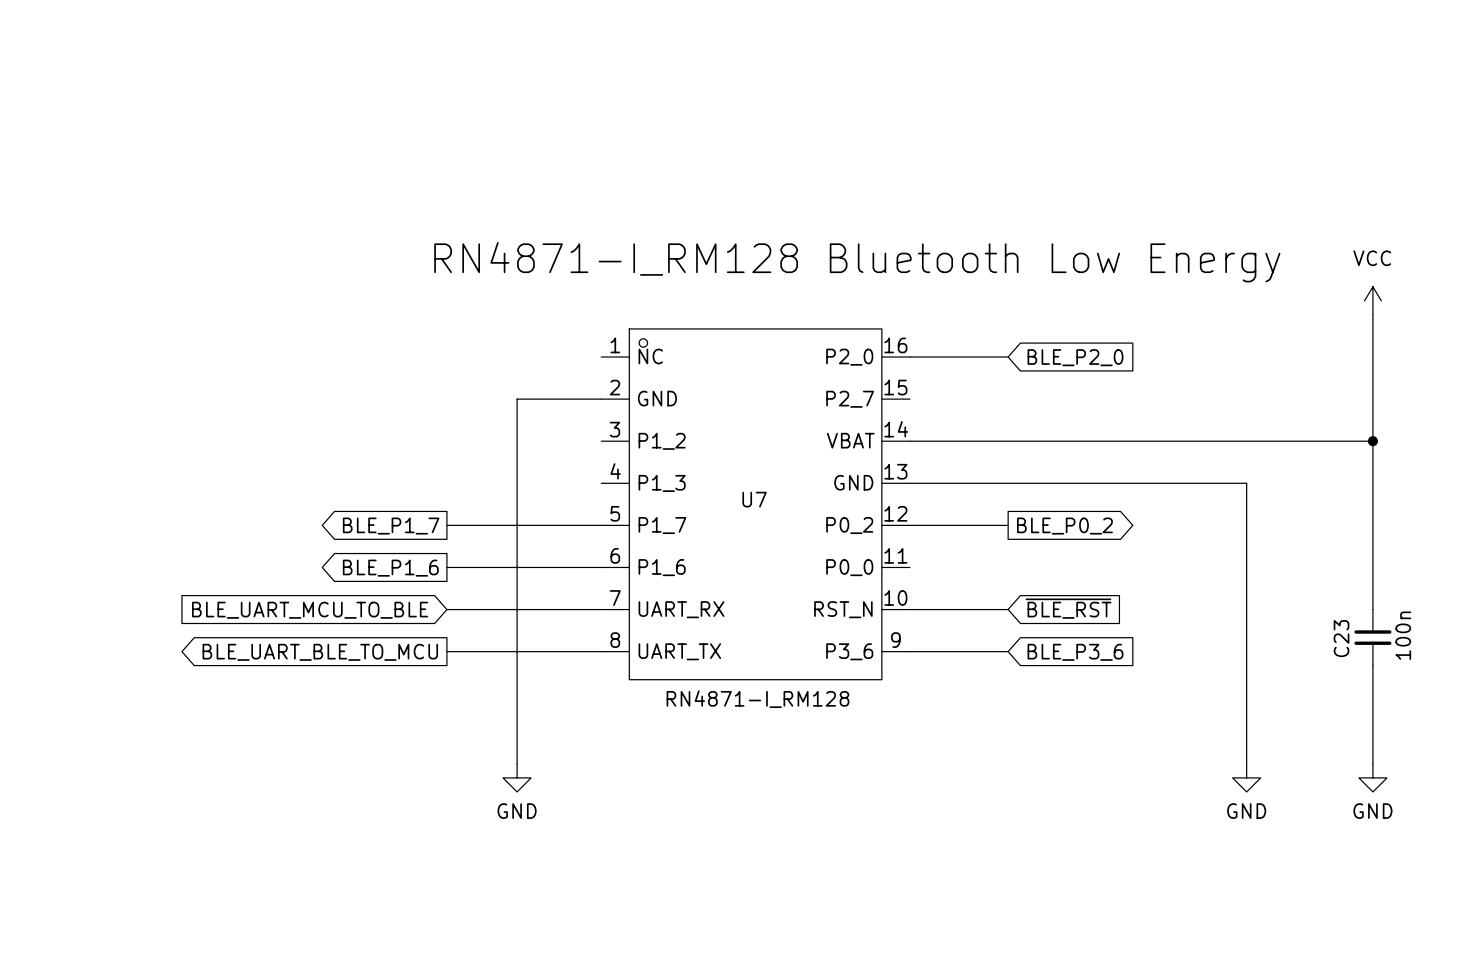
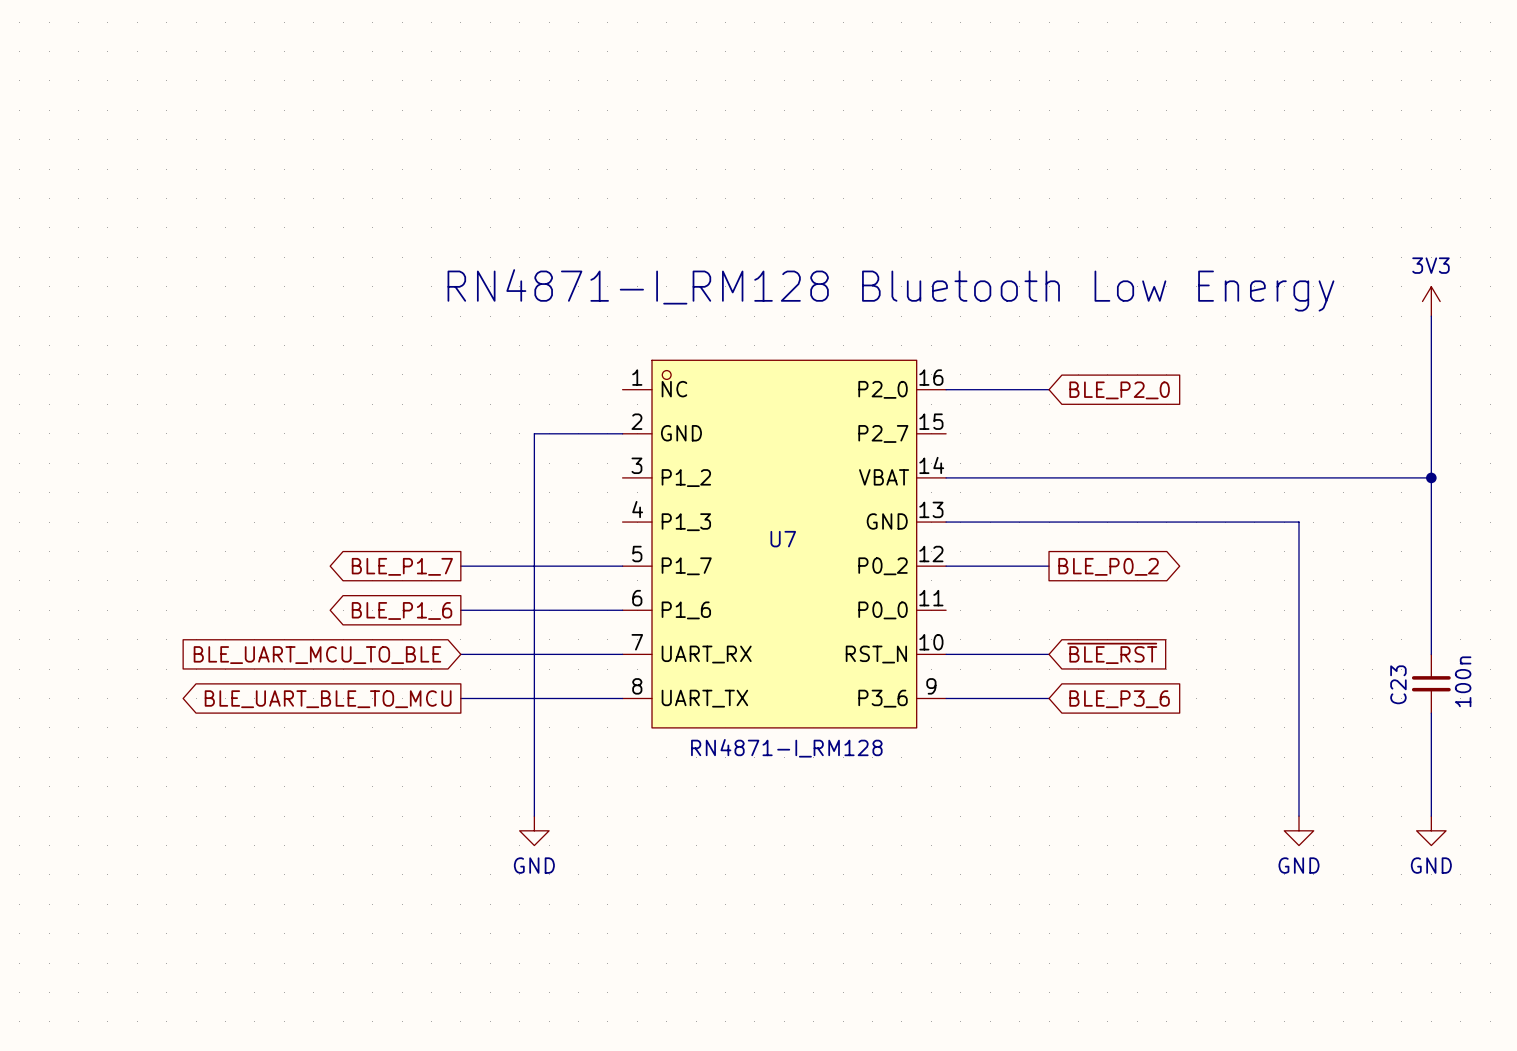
power symbol: none -> 3V3 (1431, 301)
power symbol: VCC (1372, 300) -> none

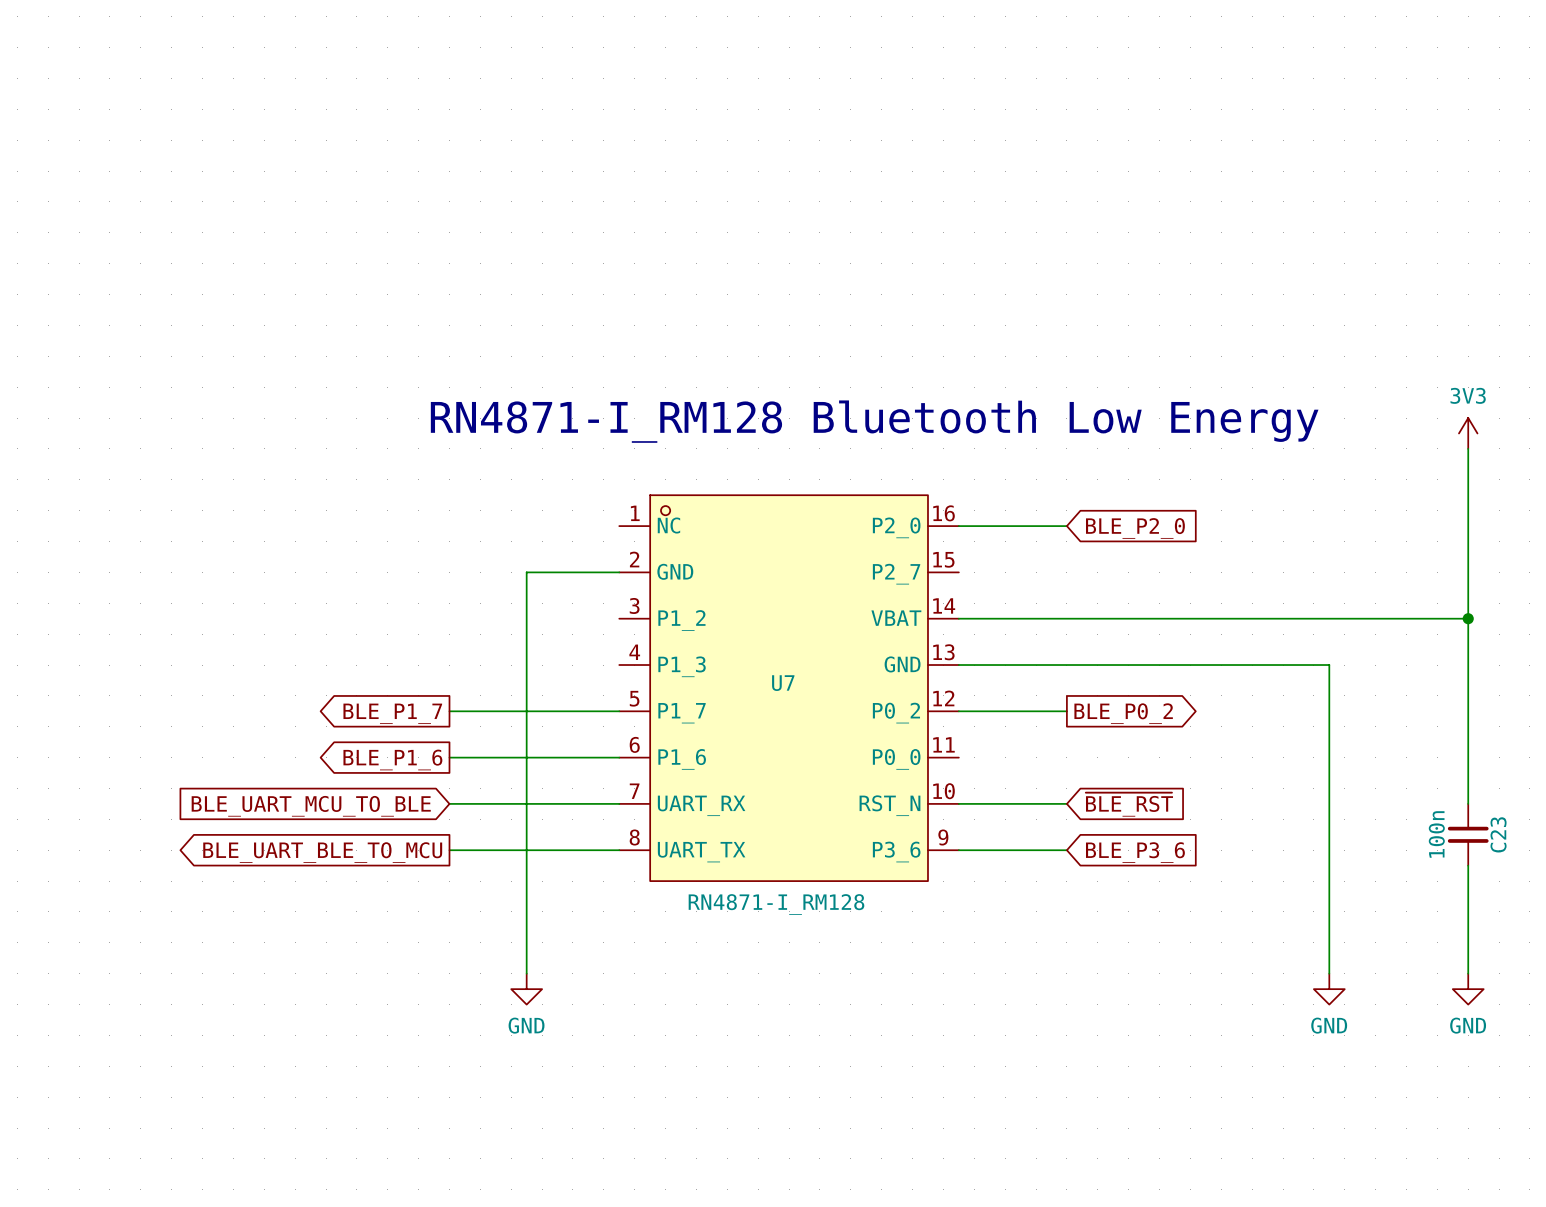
C23 value position: 100n (1463, 681) -> 100n (1436, 834)
C23 name position: C23 (1398, 684) -> C23 (1498, 834)

